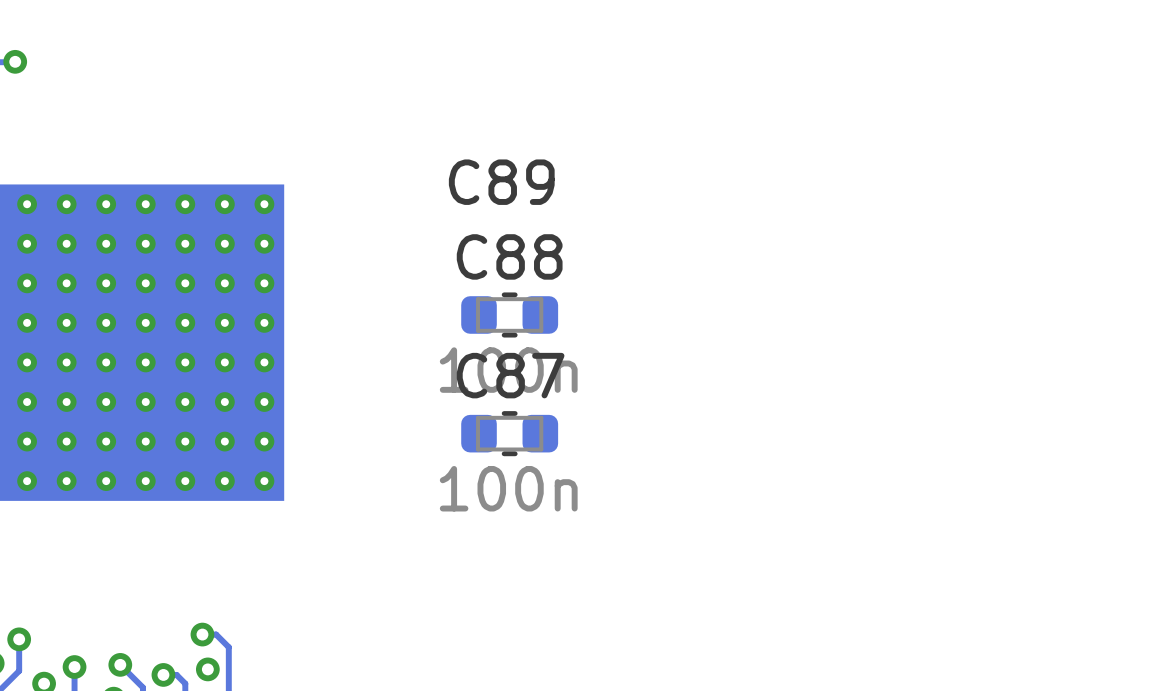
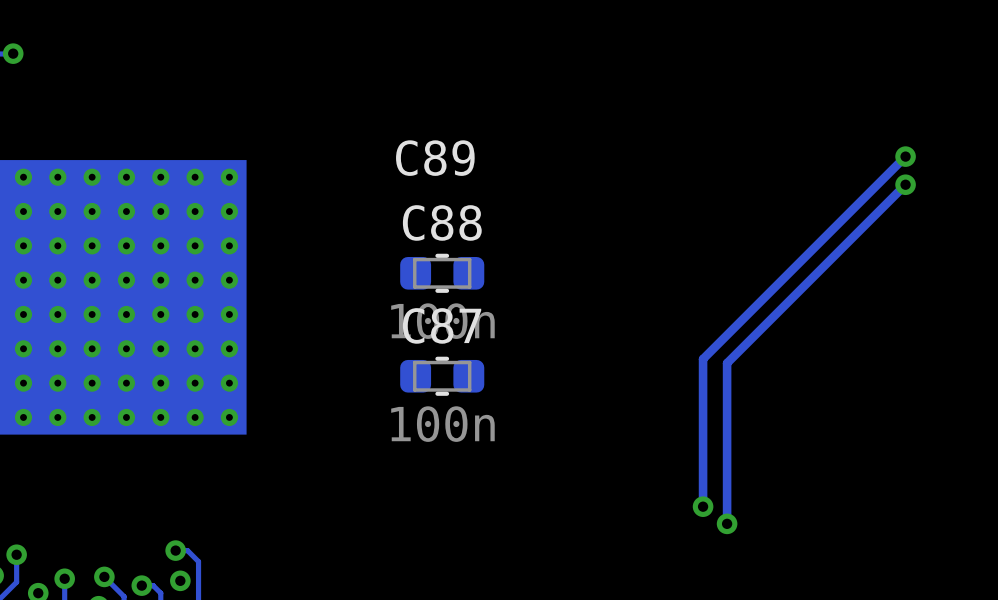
track: none -> (905, 156) (703, 359) (703, 506)
via: none -> (905, 156)
track: none -> (905, 184) (727, 363) (727, 523)
via: none -> (905, 184)
via: none -> (703, 506)
via: none -> (727, 523)

